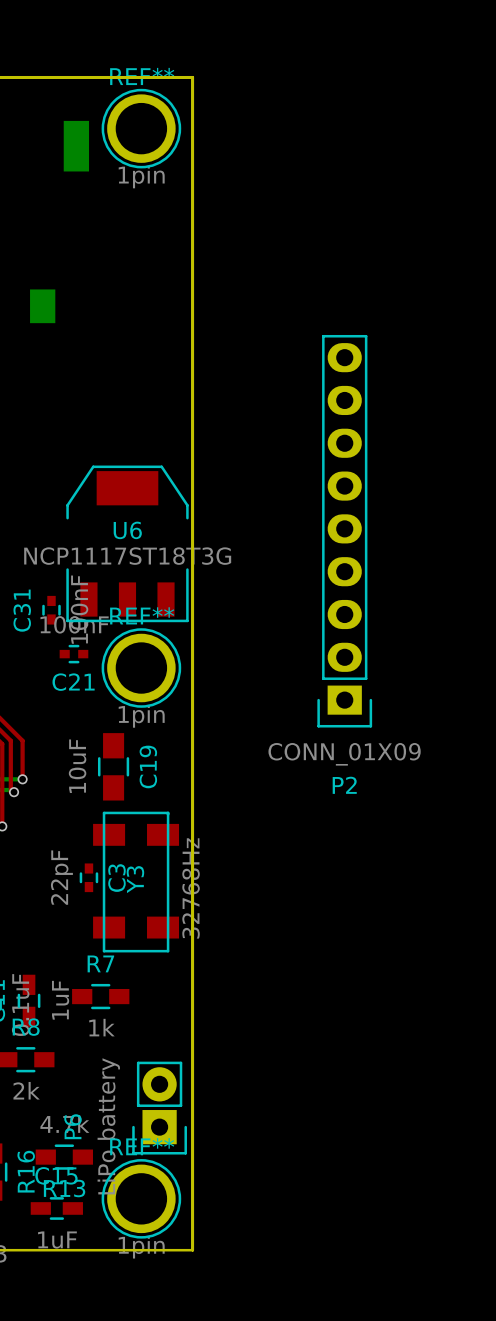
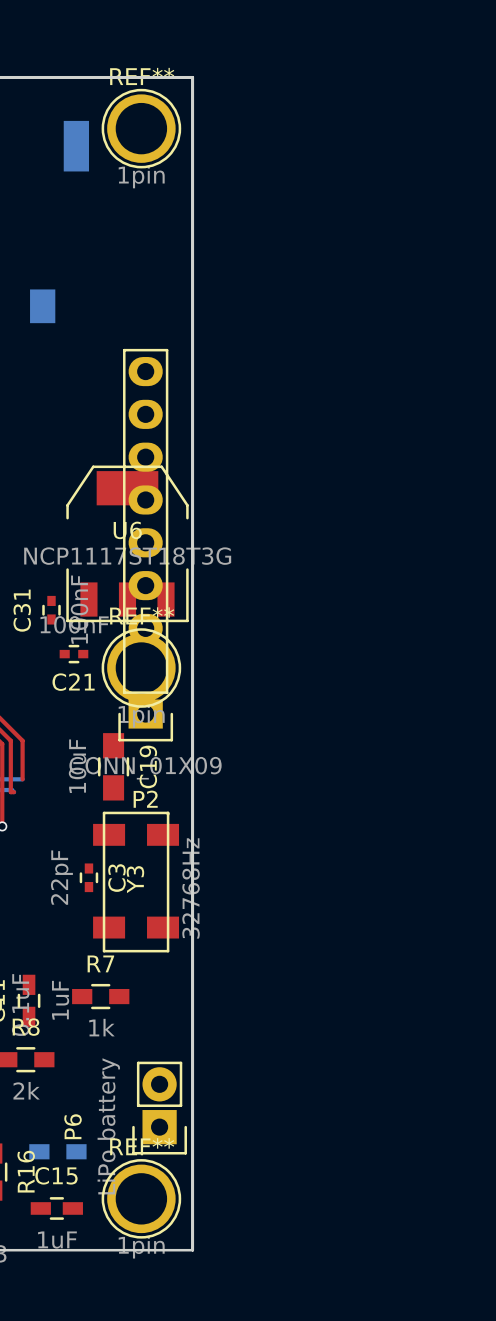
P2 position: (344, 531) -> (145, 545)
via: (22, 779) -> none
via: (14, 792) -> none
R13 side: top (64, 1157) -> bottom (57, 1151)

